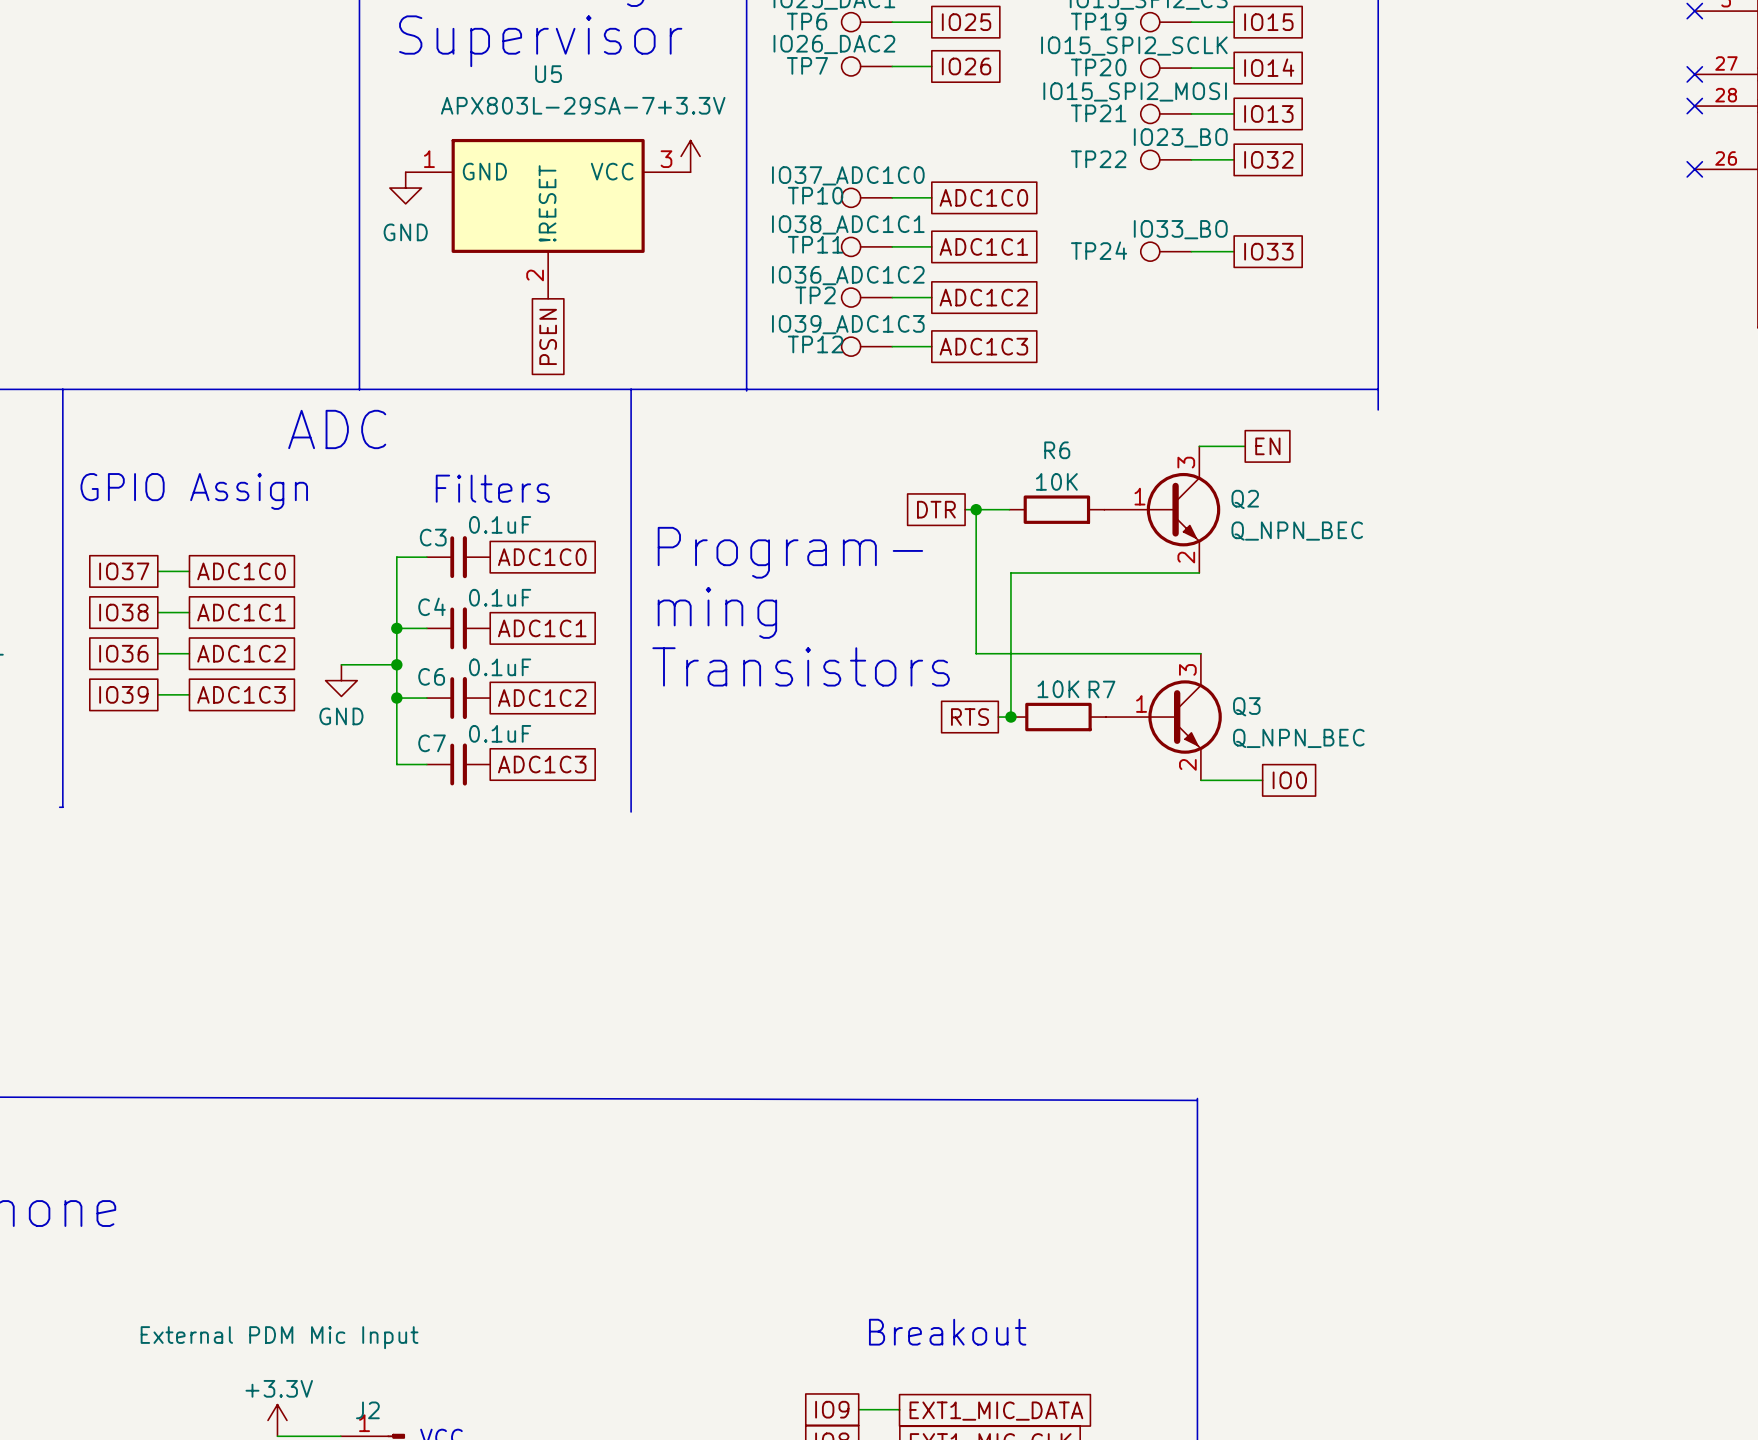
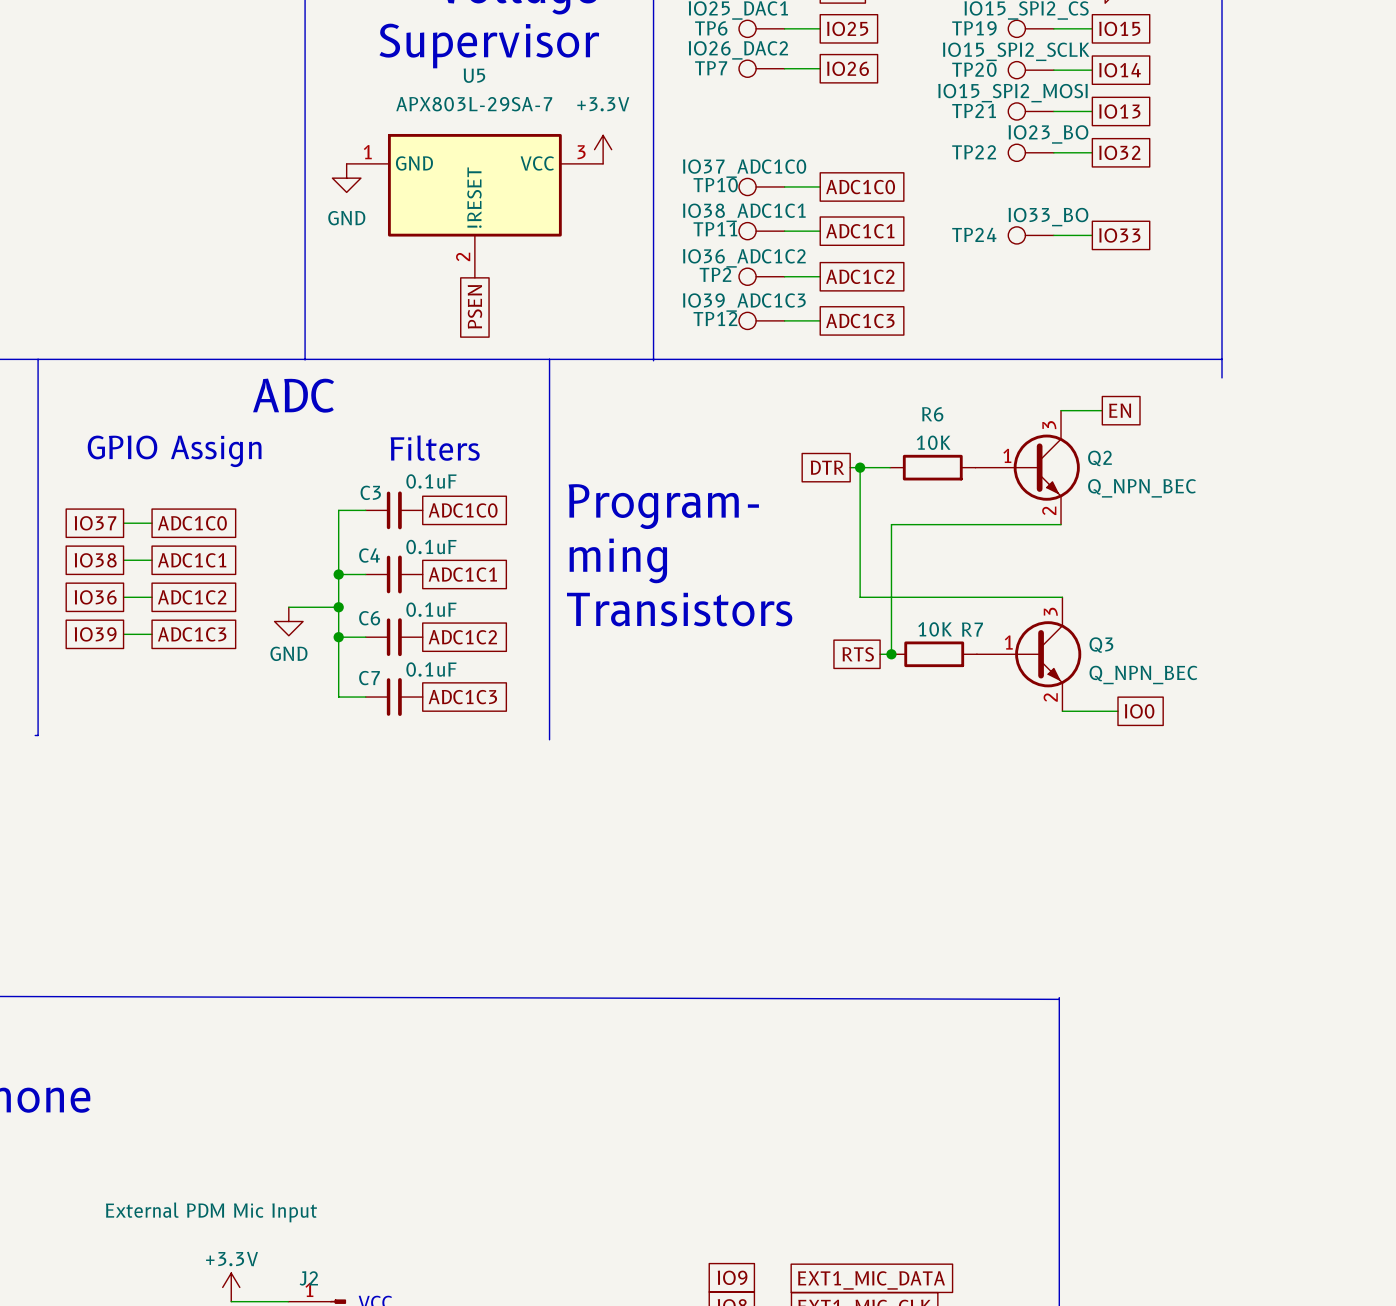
text: Breakout (947, 1332) -> none
wire: (858, 1409) (899, 1410) -> none

